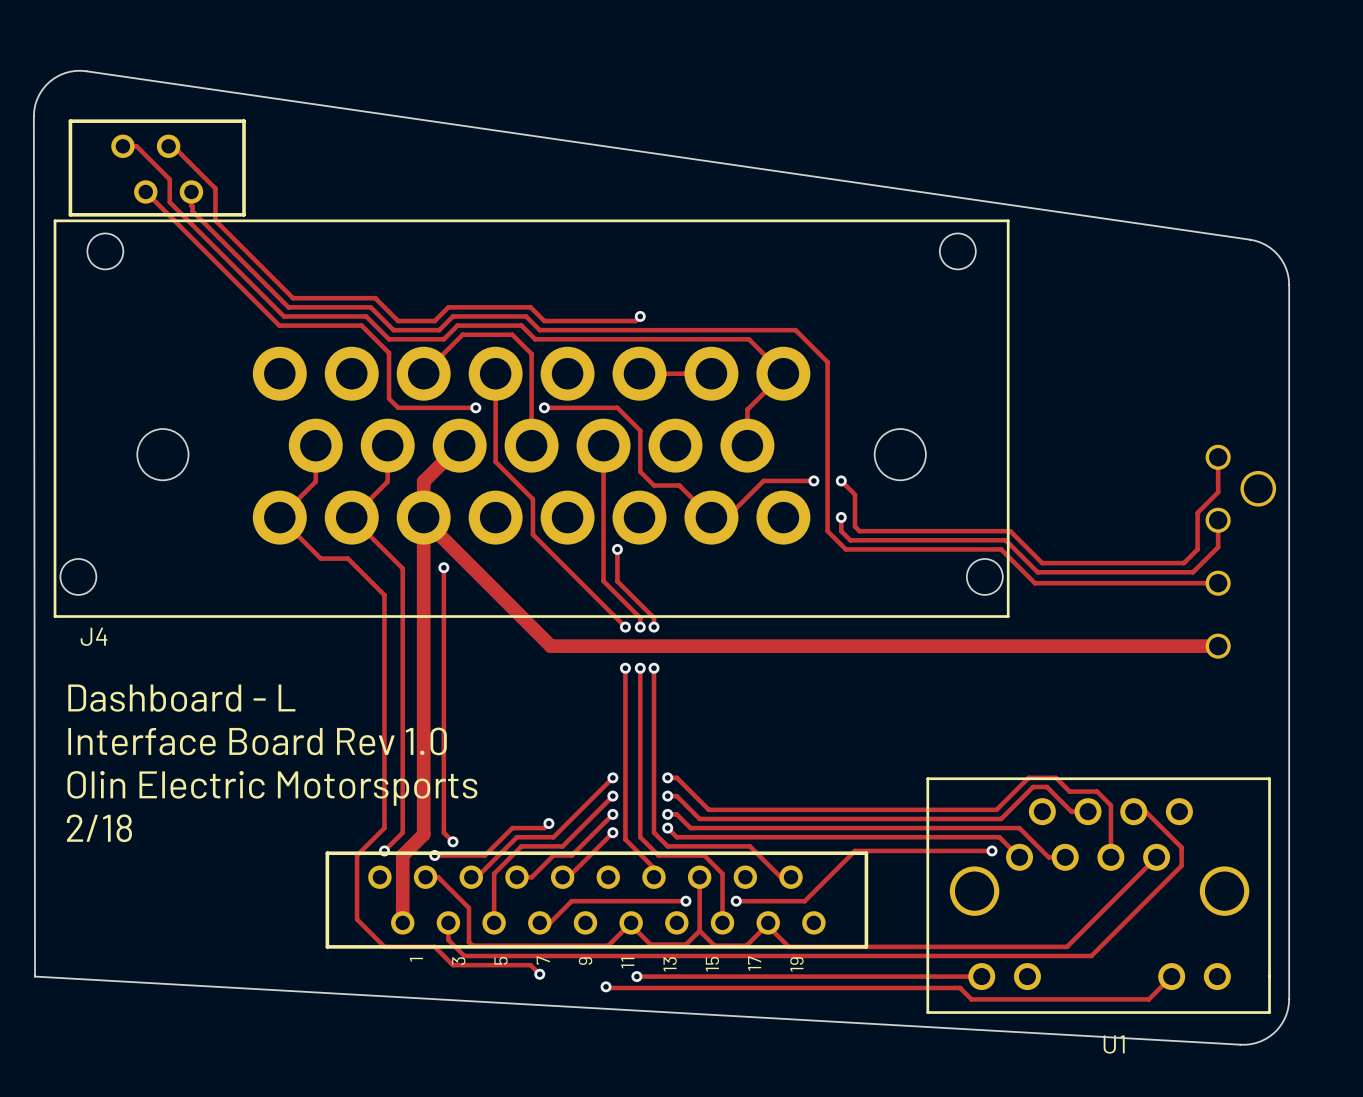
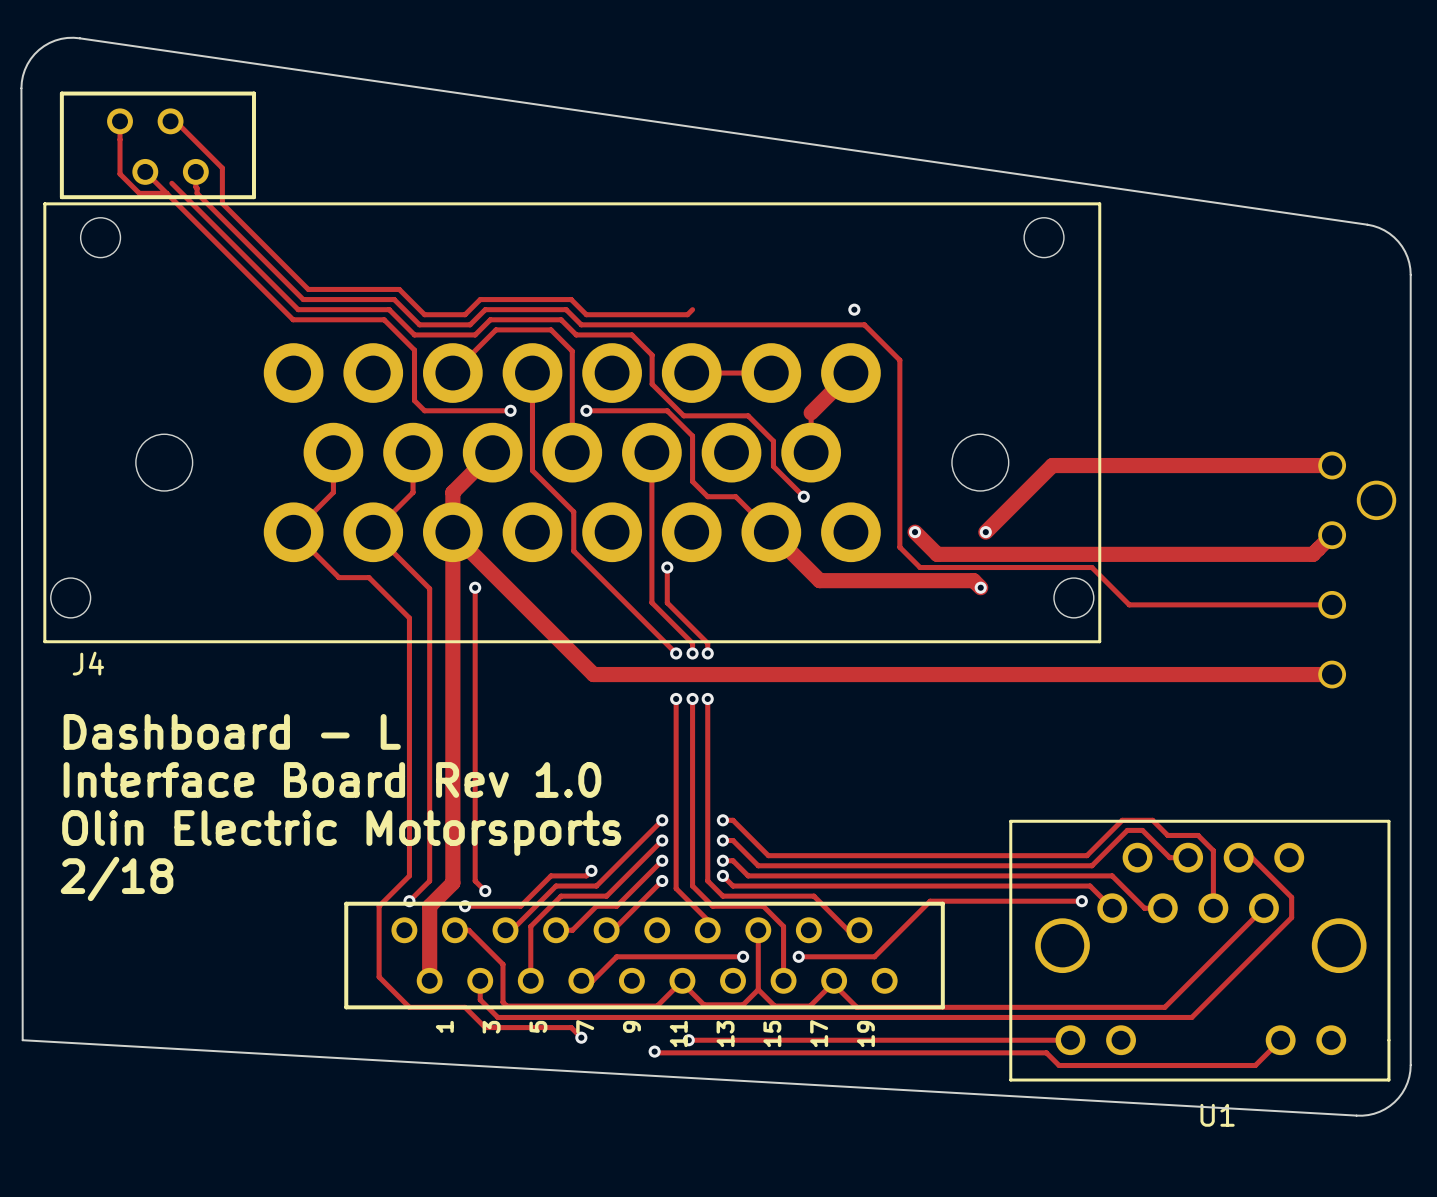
track: (122, 146) (136, 146) (169, 179) (169, 202) -> (120, 121) (120, 174) (139, 193) (166, 193)
via: (640, 316) -> none
via: none -> (854, 309)
track: (585, 339) (748, 339) (783, 373) -> (631, 334) (652, 355) (652, 384) (683, 415) (748, 415) (773, 441) (773, 466) (803, 496)
track width: thin (783, 373) (747, 409) -> thick (850, 373) (811, 412)
track: (1218, 457) (1218, 492) (1197, 512) (1197, 549) (1183, 563) (1042, 563) (1010, 531) (859, 531) (854, 526) (854, 494) (841, 480) -> (1332, 465) (1052, 465) (985, 532)
track: (813, 480) (763, 480) (726, 517) -> none
via: (813, 480) -> none
via: (841, 480) -> none
via: none -> (803, 496)
track: none -> (771, 532) (819, 580) (973, 580) (980, 587)
track: (841, 517) (841, 531) (850, 540) (1005, 540) (1037, 572) (1193, 572) (1218, 547) (1218, 520) -> (915, 532) (937, 554) (1312, 554) (1332, 535)
via: none -> (985, 532)
via: none -> (980, 587)

